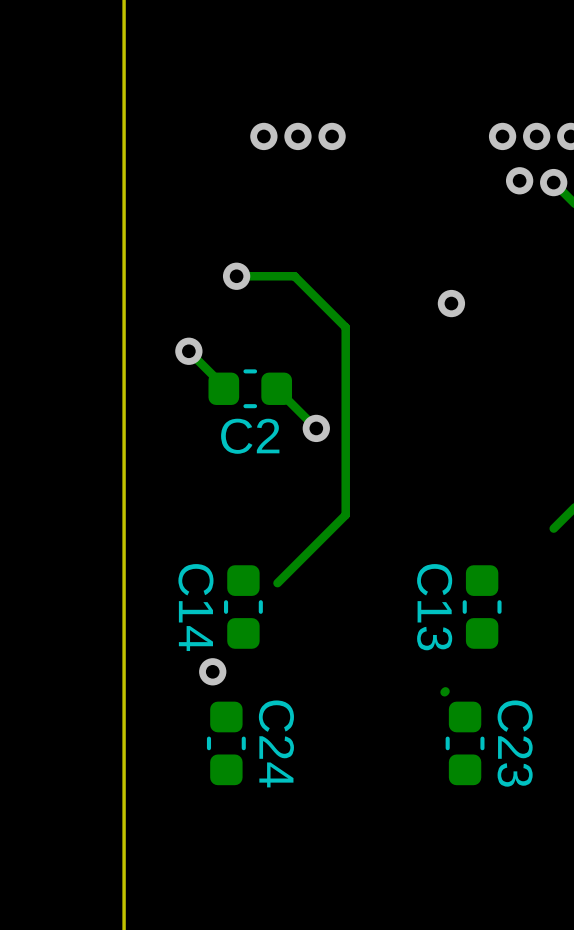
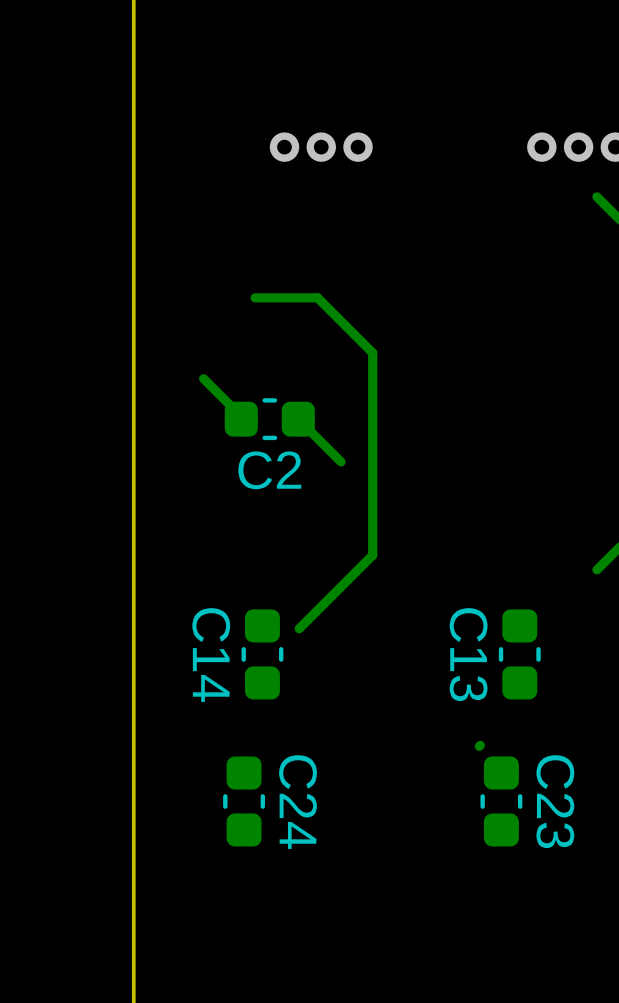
via: (519, 180) -> none
via: (553, 182) -> none
via: (236, 276) -> none
via: (451, 303) -> none
via: (188, 351) -> none
via: (316, 428) -> none
via: (212, 671) -> none

